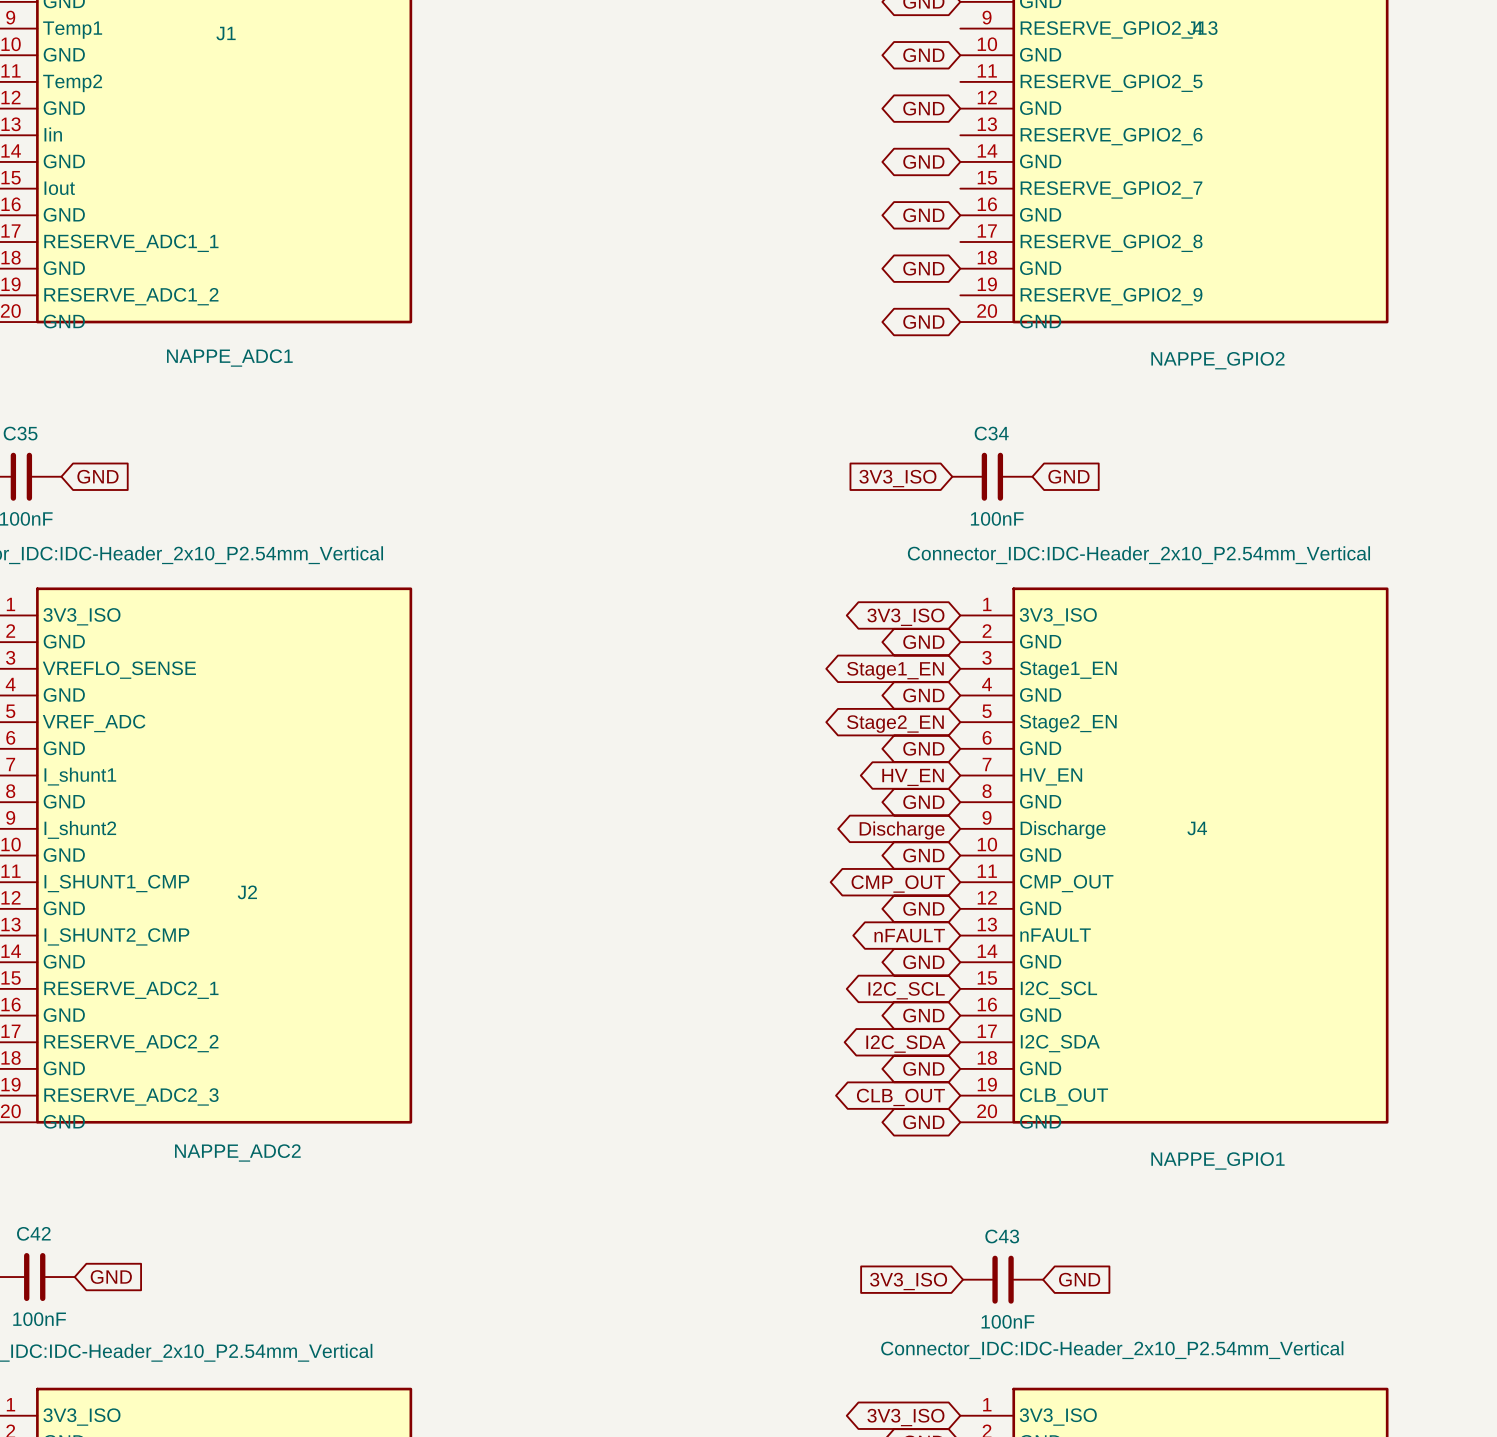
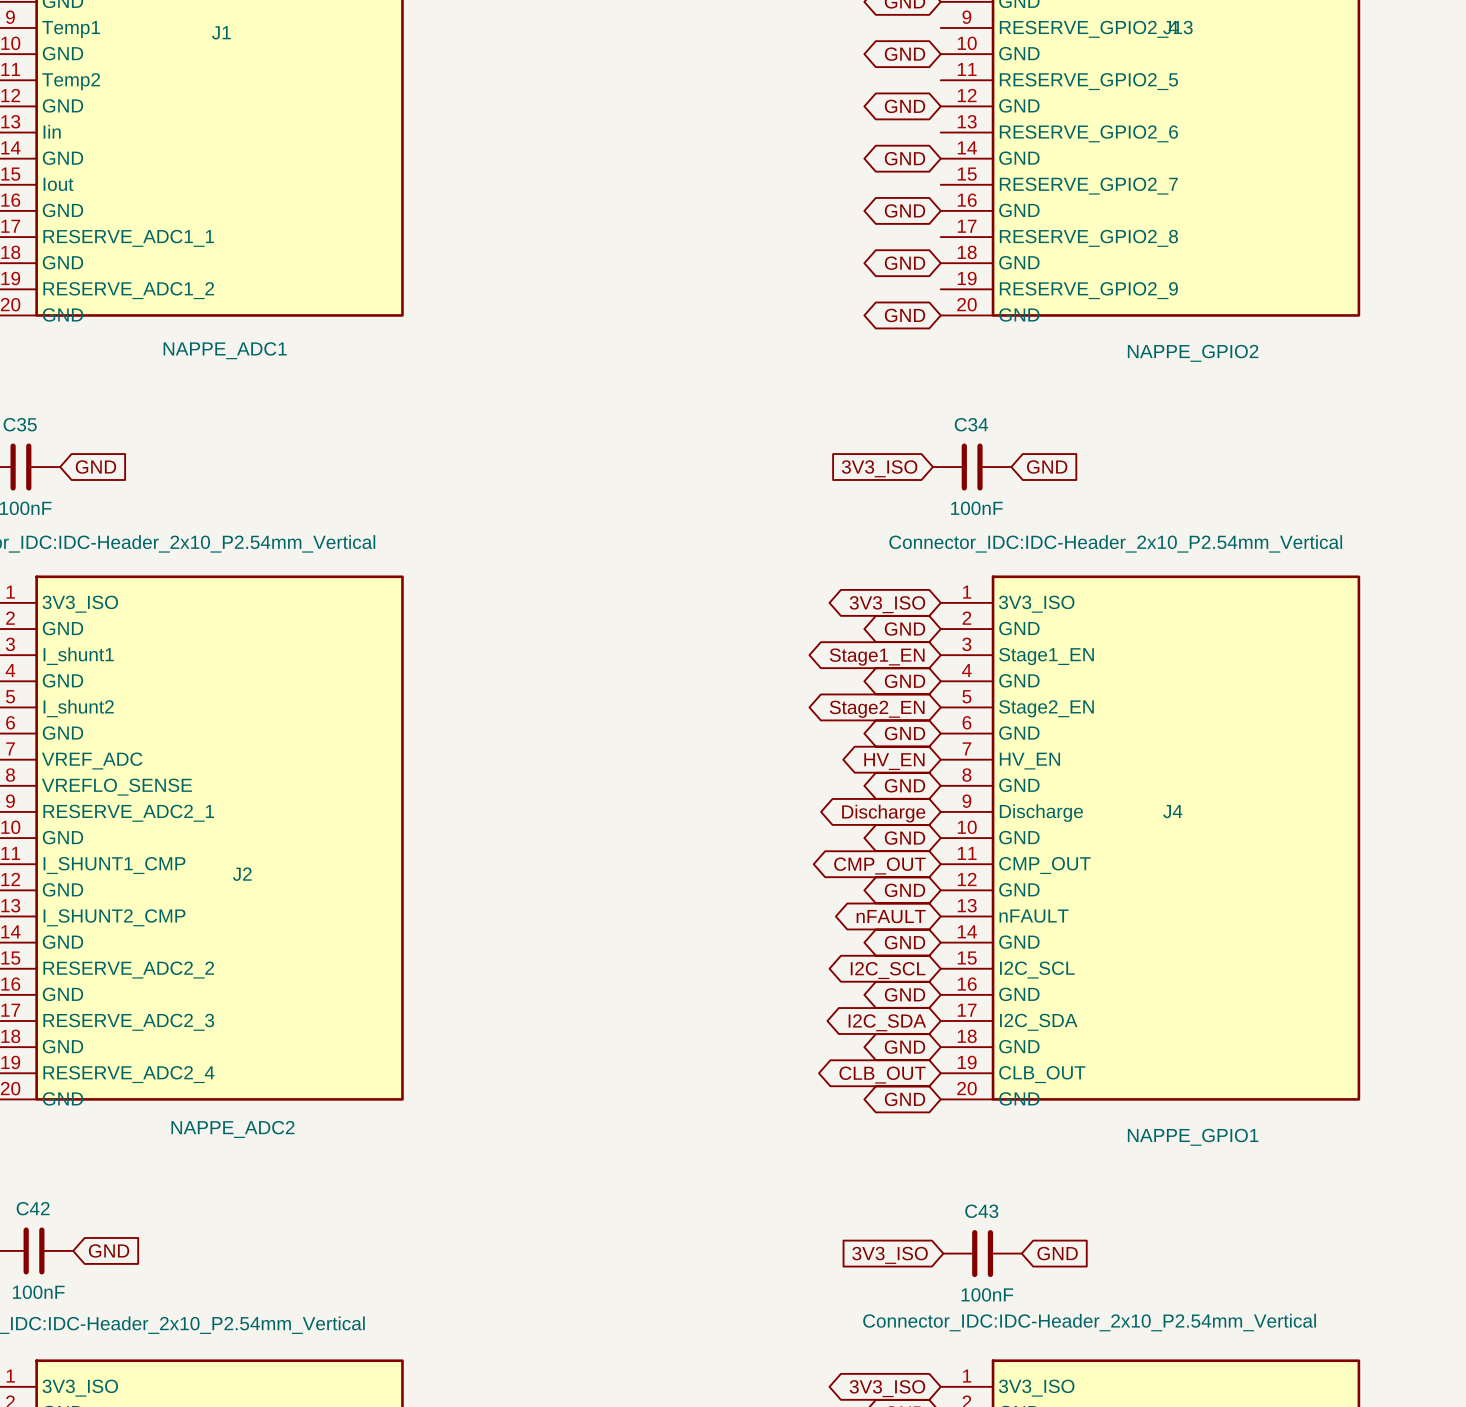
J2 pin name: VREFLO_SENSE (119, 670) -> I_shunt1 (78, 656)
J2 pin name: VREF_ADC (94, 723) -> I_shunt2 (78, 708)
J2 pin name: I_shunt1 (80, 776) -> VREF_ADC (92, 760)
J2 pin name: GND (64, 801) -> VREFLO_SENSE (116, 787)
J2 pin name: I_shunt2 (80, 829) -> RESERVE_ADC2_1 (128, 813)
J2 pin name: RESERVE_ADC2_1 (131, 990) -> RESERVE_ADC2_2 (128, 970)
J2 pin name: RESERVE_ADC2_2 (131, 1043) -> RESERVE_ADC2_3 (128, 1022)
J2 pin name: RESERVE_ADC2_3 (131, 1096) -> RESERVE_ADC2_4 (128, 1074)

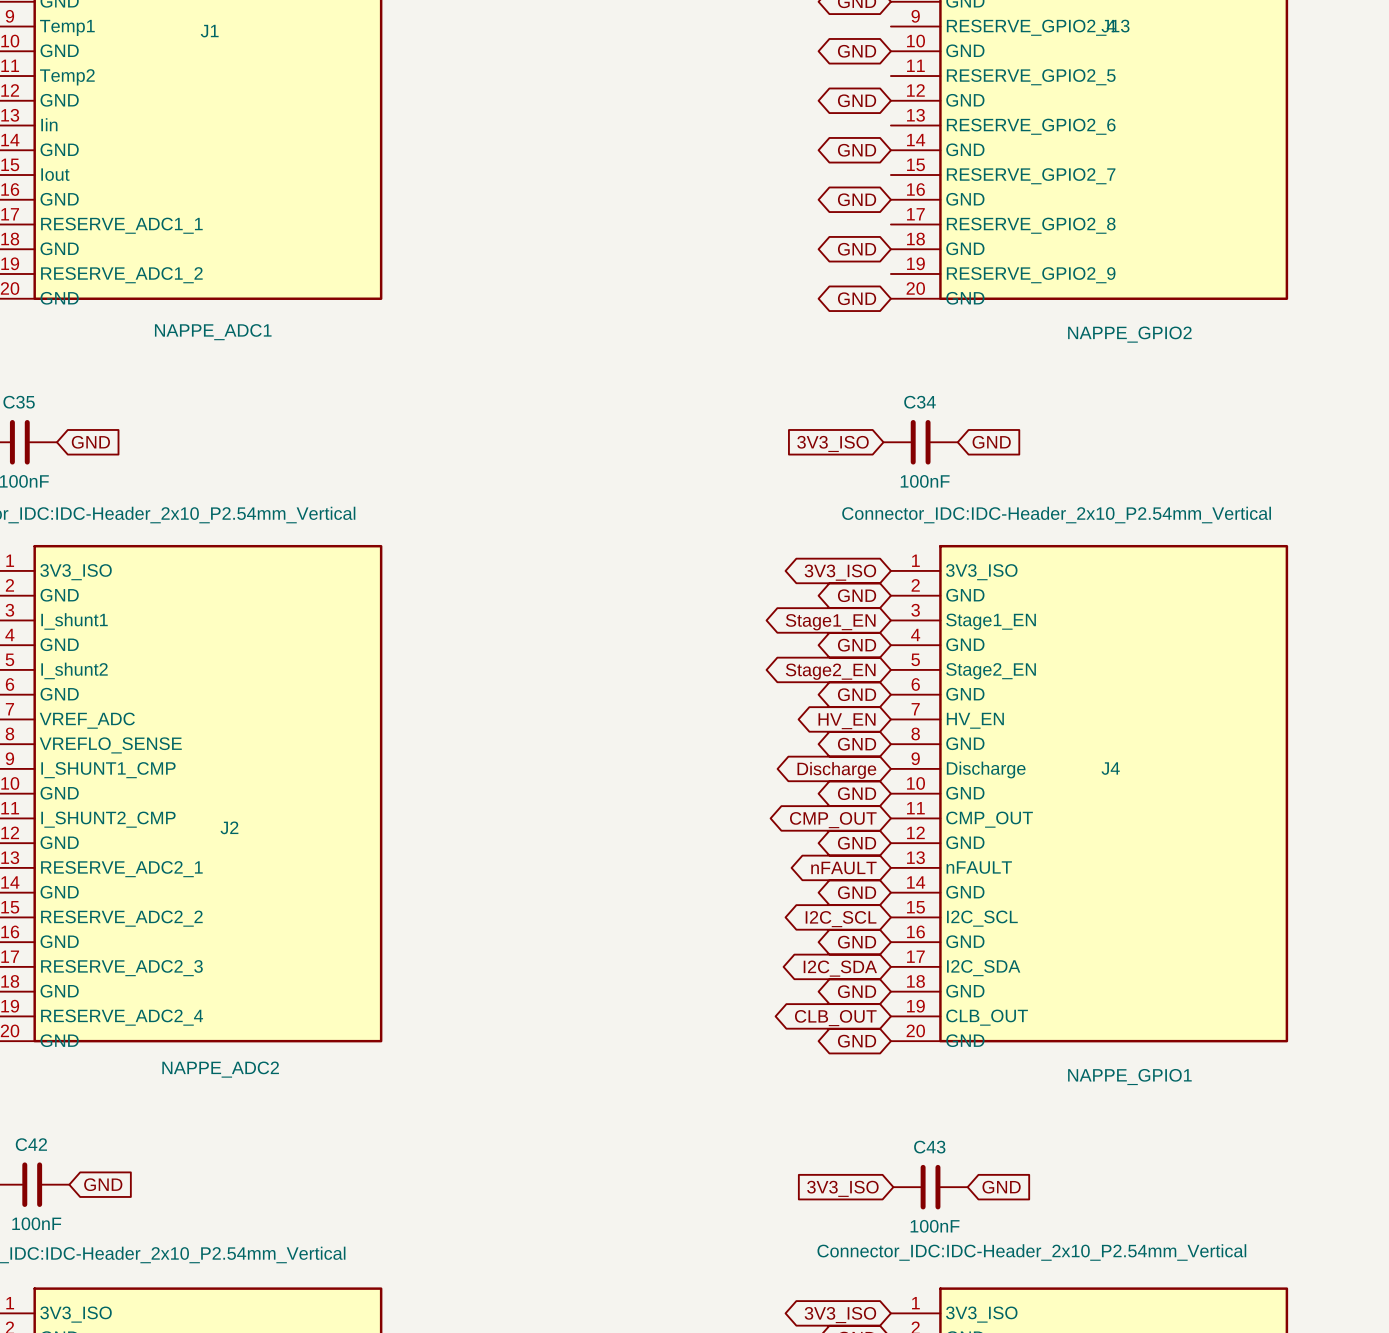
J2 pin name: RESERVE_ADC2_1 (128, 813) -> I_SHUNT1_CMP (108, 770)
J2 pin name: I_SHUNT1_CMP (114, 865) -> I_SHUNT2_CMP (108, 819)
J2 pin name: I_SHUNT2_CMP (114, 917) -> RESERVE_ADC2_1 (121, 869)

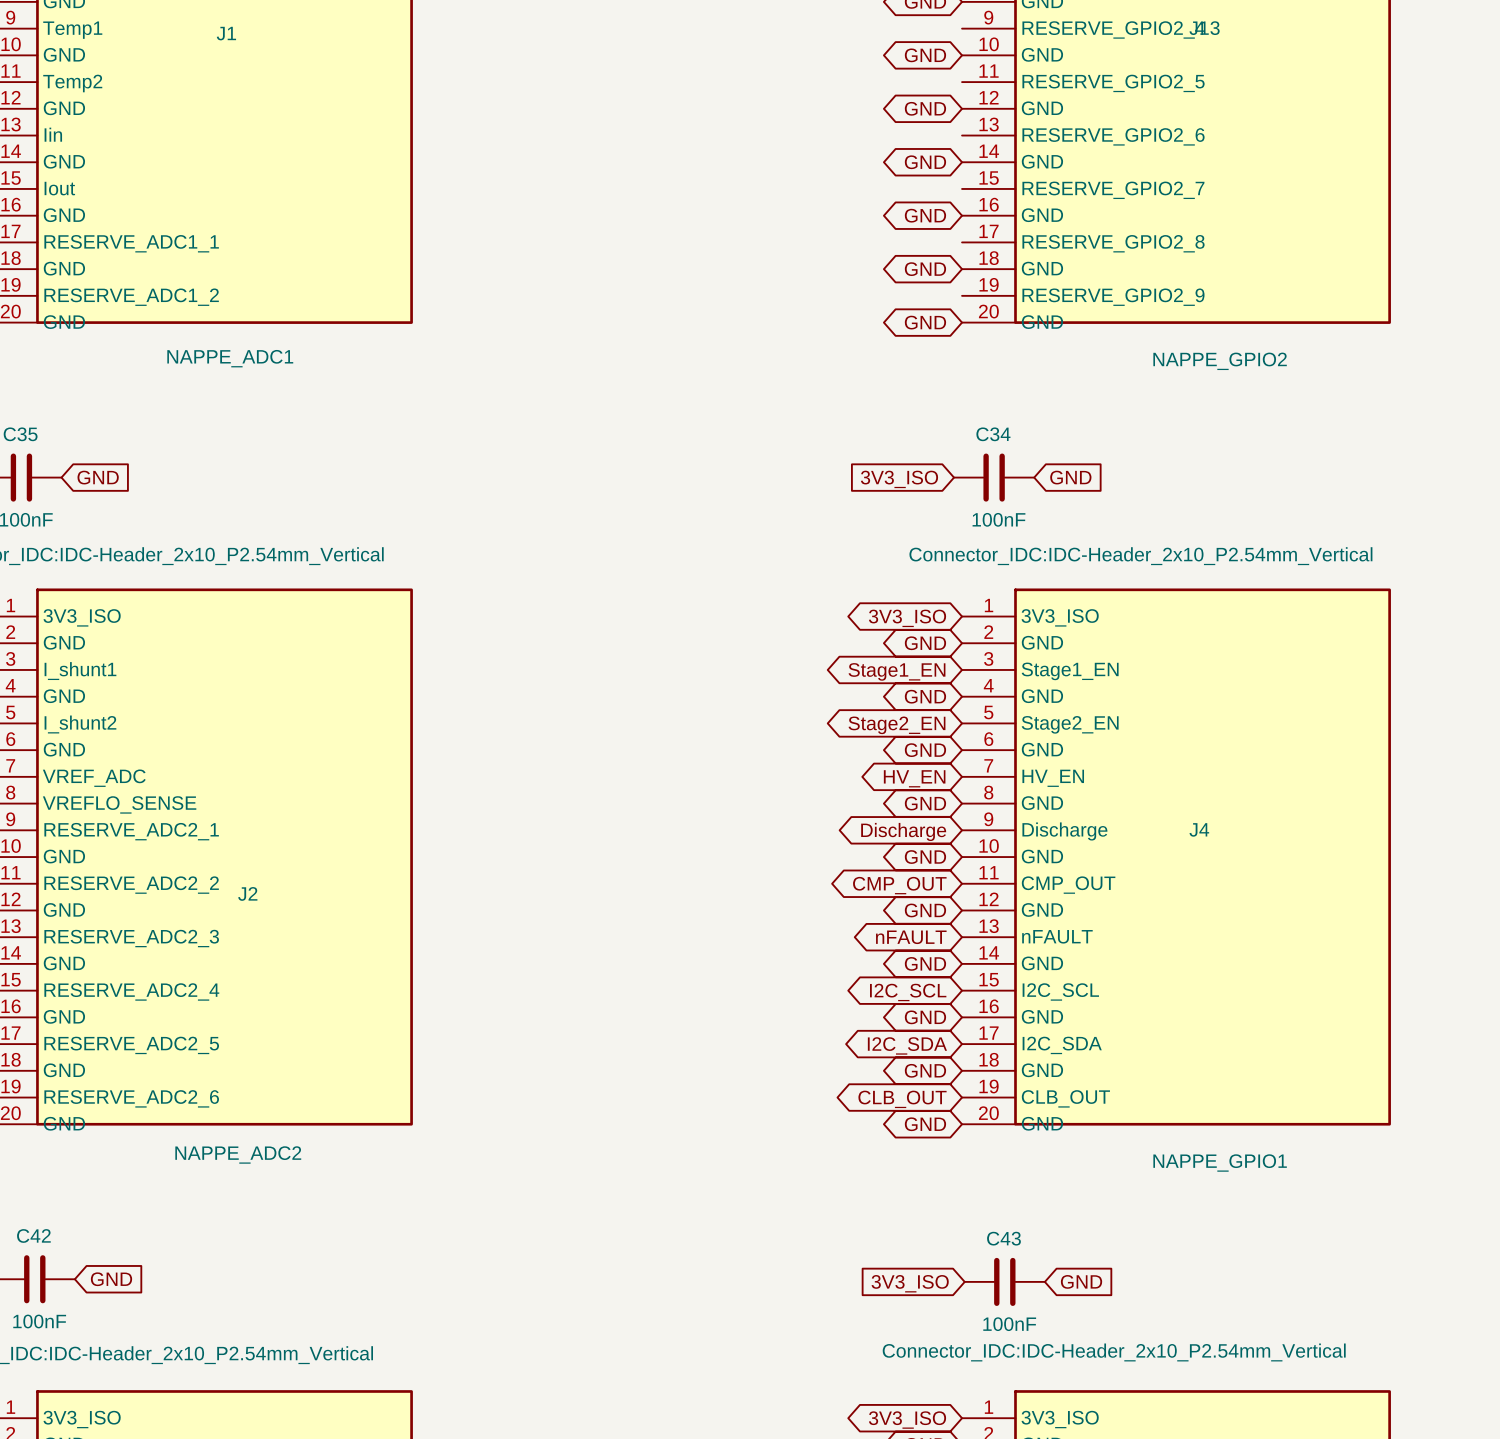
J2 pin name: I_SHUNT1_CMP (108, 770) -> RESERVE_ADC2_1 (131, 831)
J2 pin name: I_SHUNT2_CMP (108, 819) -> RESERVE_ADC2_2 (131, 885)
J2 pin name: RESERVE_ADC2_1 (121, 869) -> RESERVE_ADC2_3 (131, 938)
J2 pin name: RESERVE_ADC2_2 (121, 918) -> RESERVE_ADC2_4 (131, 991)
J2 pin name: RESERVE_ADC2_3 (121, 968) -> RESERVE_ADC2_5 (131, 1045)
J2 pin name: RESERVE_ADC2_4 (122, 1017) -> RESERVE_ADC2_6 (131, 1098)

